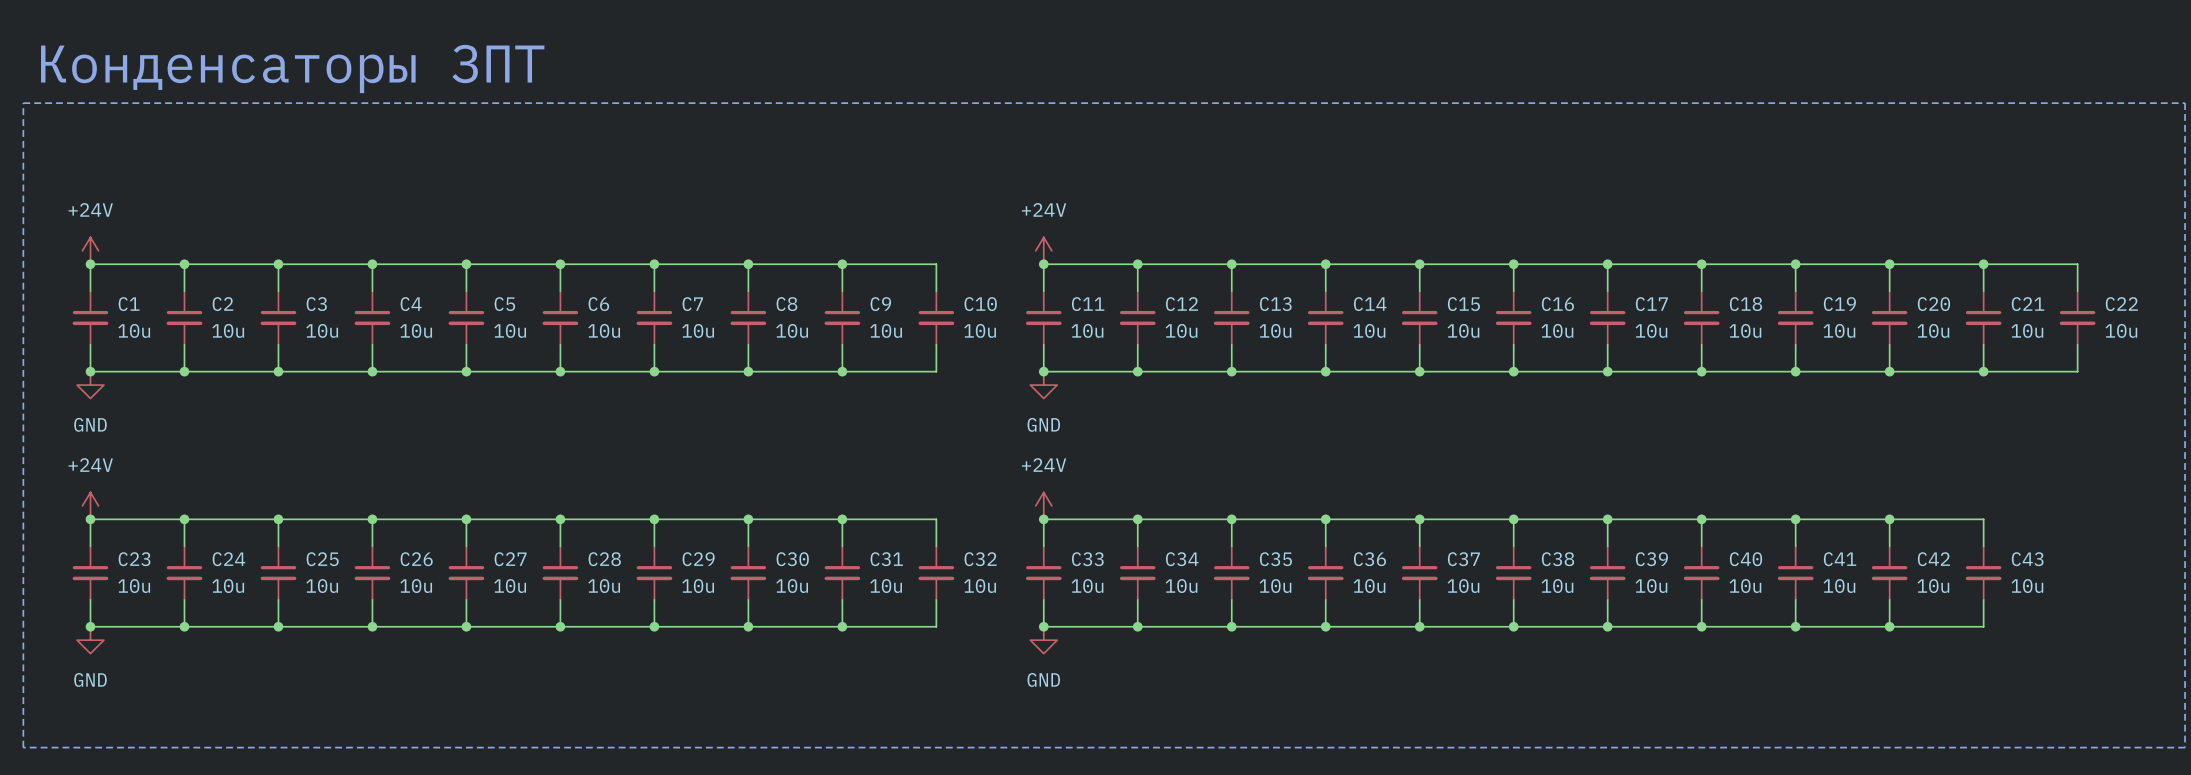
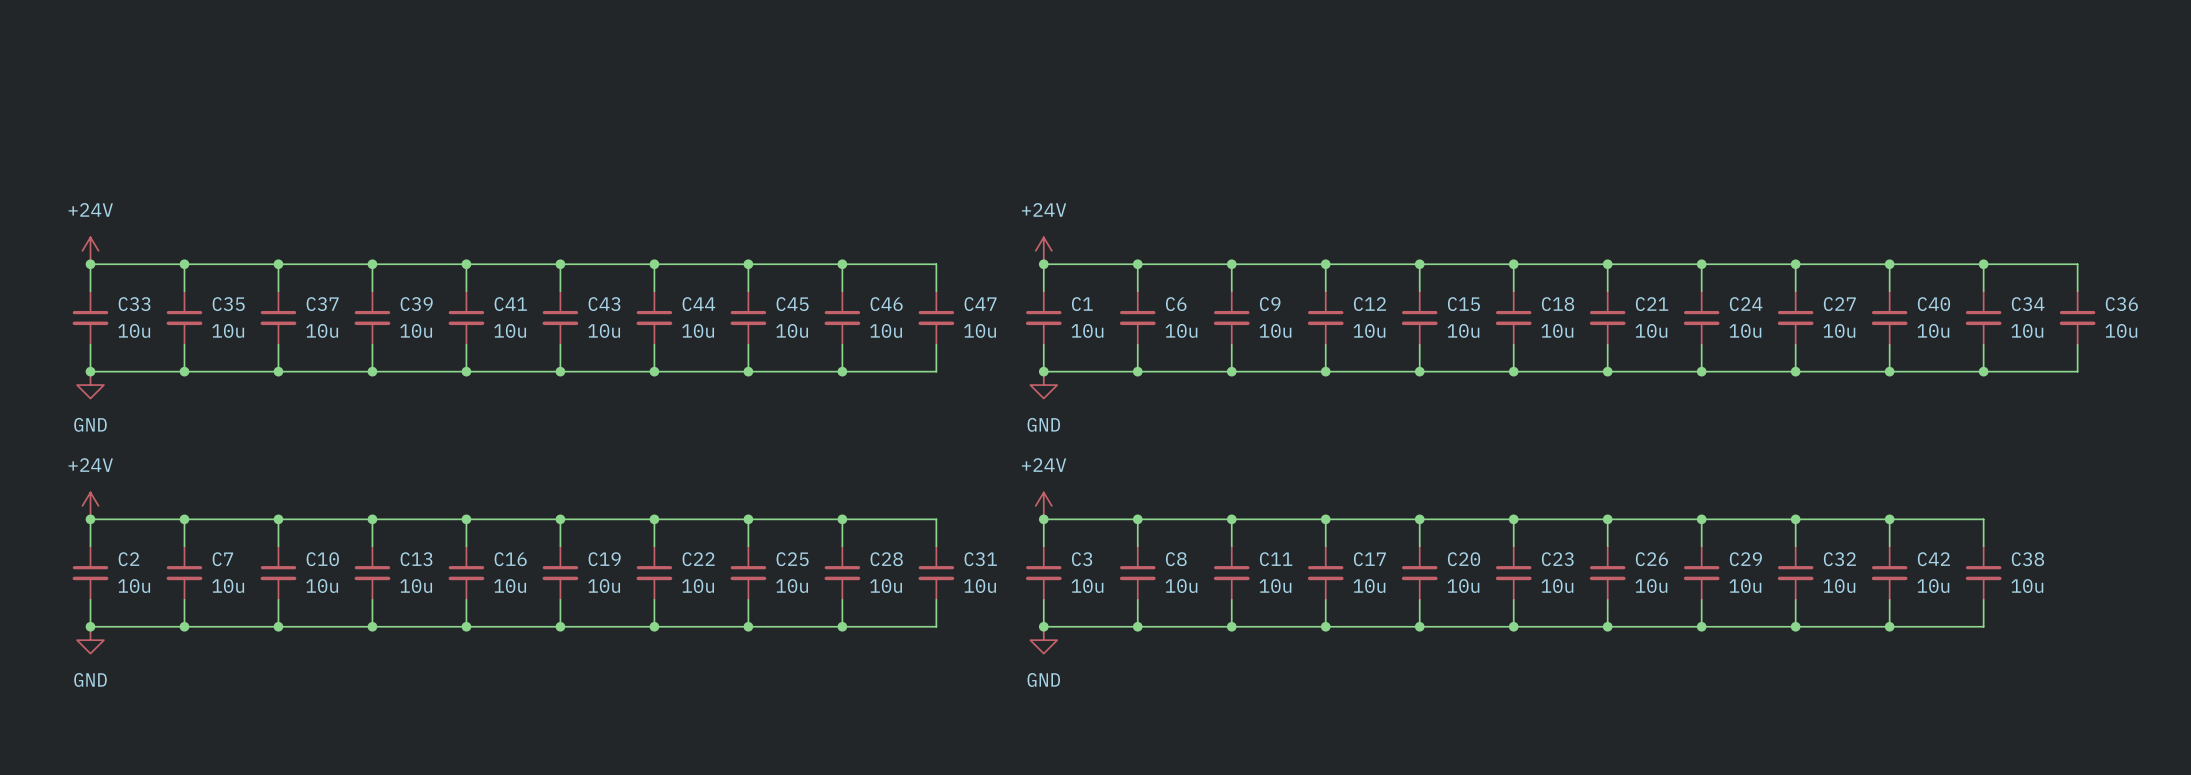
text: Конденсаторы ЗПТ (292, 69) -> none
line: (23, 103) (2185, 103) (2185, 747) (23, 747) (23, 103) -> none
C1 name: C1 (129, 304) -> C33 (134, 304)
C2 name: C2 (222, 304) -> C35 (228, 304)
C3 name: C3 (316, 304) -> C37 (322, 304)
C4 name: C4 (411, 304) -> C39 (416, 304)
C5 name: C5 (504, 304) -> C41 (510, 304)
C6 name: C6 (598, 304) -> C43 (604, 304)
C7 name: C7 (692, 304) -> C44 (698, 304)
C8 name: C8 (786, 304) -> C45 (792, 304)
C9 name: C9 (880, 304) -> C46 (886, 304)
C10 name: C10 (980, 304) -> C47 (980, 304)
C11 name: C11 (1088, 304) -> C1 (1082, 304)
C12 name: C12 (1182, 304) -> C6 (1176, 304)
C13 name: C13 (1275, 304) -> C9 (1270, 304)
C14 name: C14 (1370, 304) -> C12 (1369, 304)
C16 name: C16 (1557, 304) -> C18 (1558, 304)
C17 name: C17 (1651, 304) -> C21 (1652, 304)
C18 name: C18 (1745, 304) -> C24 (1746, 304)
C19 name: C19 (1839, 304) -> C27 (1839, 304)
C20 name: C20 (1933, 304) -> C40 (1933, 304)
C21 name: C21 (2028, 304) -> C34 (2028, 304)
C22 name: C22 (2121, 304) -> C36 (2121, 304)
C23 name: C23 (134, 559) -> C2 (128, 559)
C24 name: C24 (228, 559) -> C7 (222, 559)
C25 name: C25 (322, 559) -> C10 (322, 559)
C26 name: C26 (416, 559) -> C13 (416, 559)
C27 name: C27 (510, 559) -> C16 (510, 559)
C28 name: C28 (604, 559) -> C19 (604, 559)
C29 name: C29 (698, 559) -> C22 (698, 559)
C30 name: C30 (792, 559) -> C25 (792, 559)
C31 name: C31 (886, 559) -> C28 (886, 559)
C32 name: C32 (980, 559) -> C31 (980, 559)
C33 name: C33 (1087, 559) -> C3 (1082, 559)
C34 name: C34 (1182, 559) -> C8 (1176, 559)
C35 name: C35 (1275, 559) -> C11 (1276, 559)
C36 name: C36 (1369, 559) -> C17 (1369, 559)
C37 name: C37 (1463, 559) -> C20 (1464, 559)
C38 name: C38 (1558, 559) -> C23 (1557, 559)
C39 name: C39 (1651, 559) -> C26 (1651, 559)
C40 name: C40 (1745, 559) -> C29 (1745, 559)
C41 name: C41 (1840, 559) -> C32 (1839, 559)
C43 name: C43 (2027, 559) -> C38 (2027, 559)

